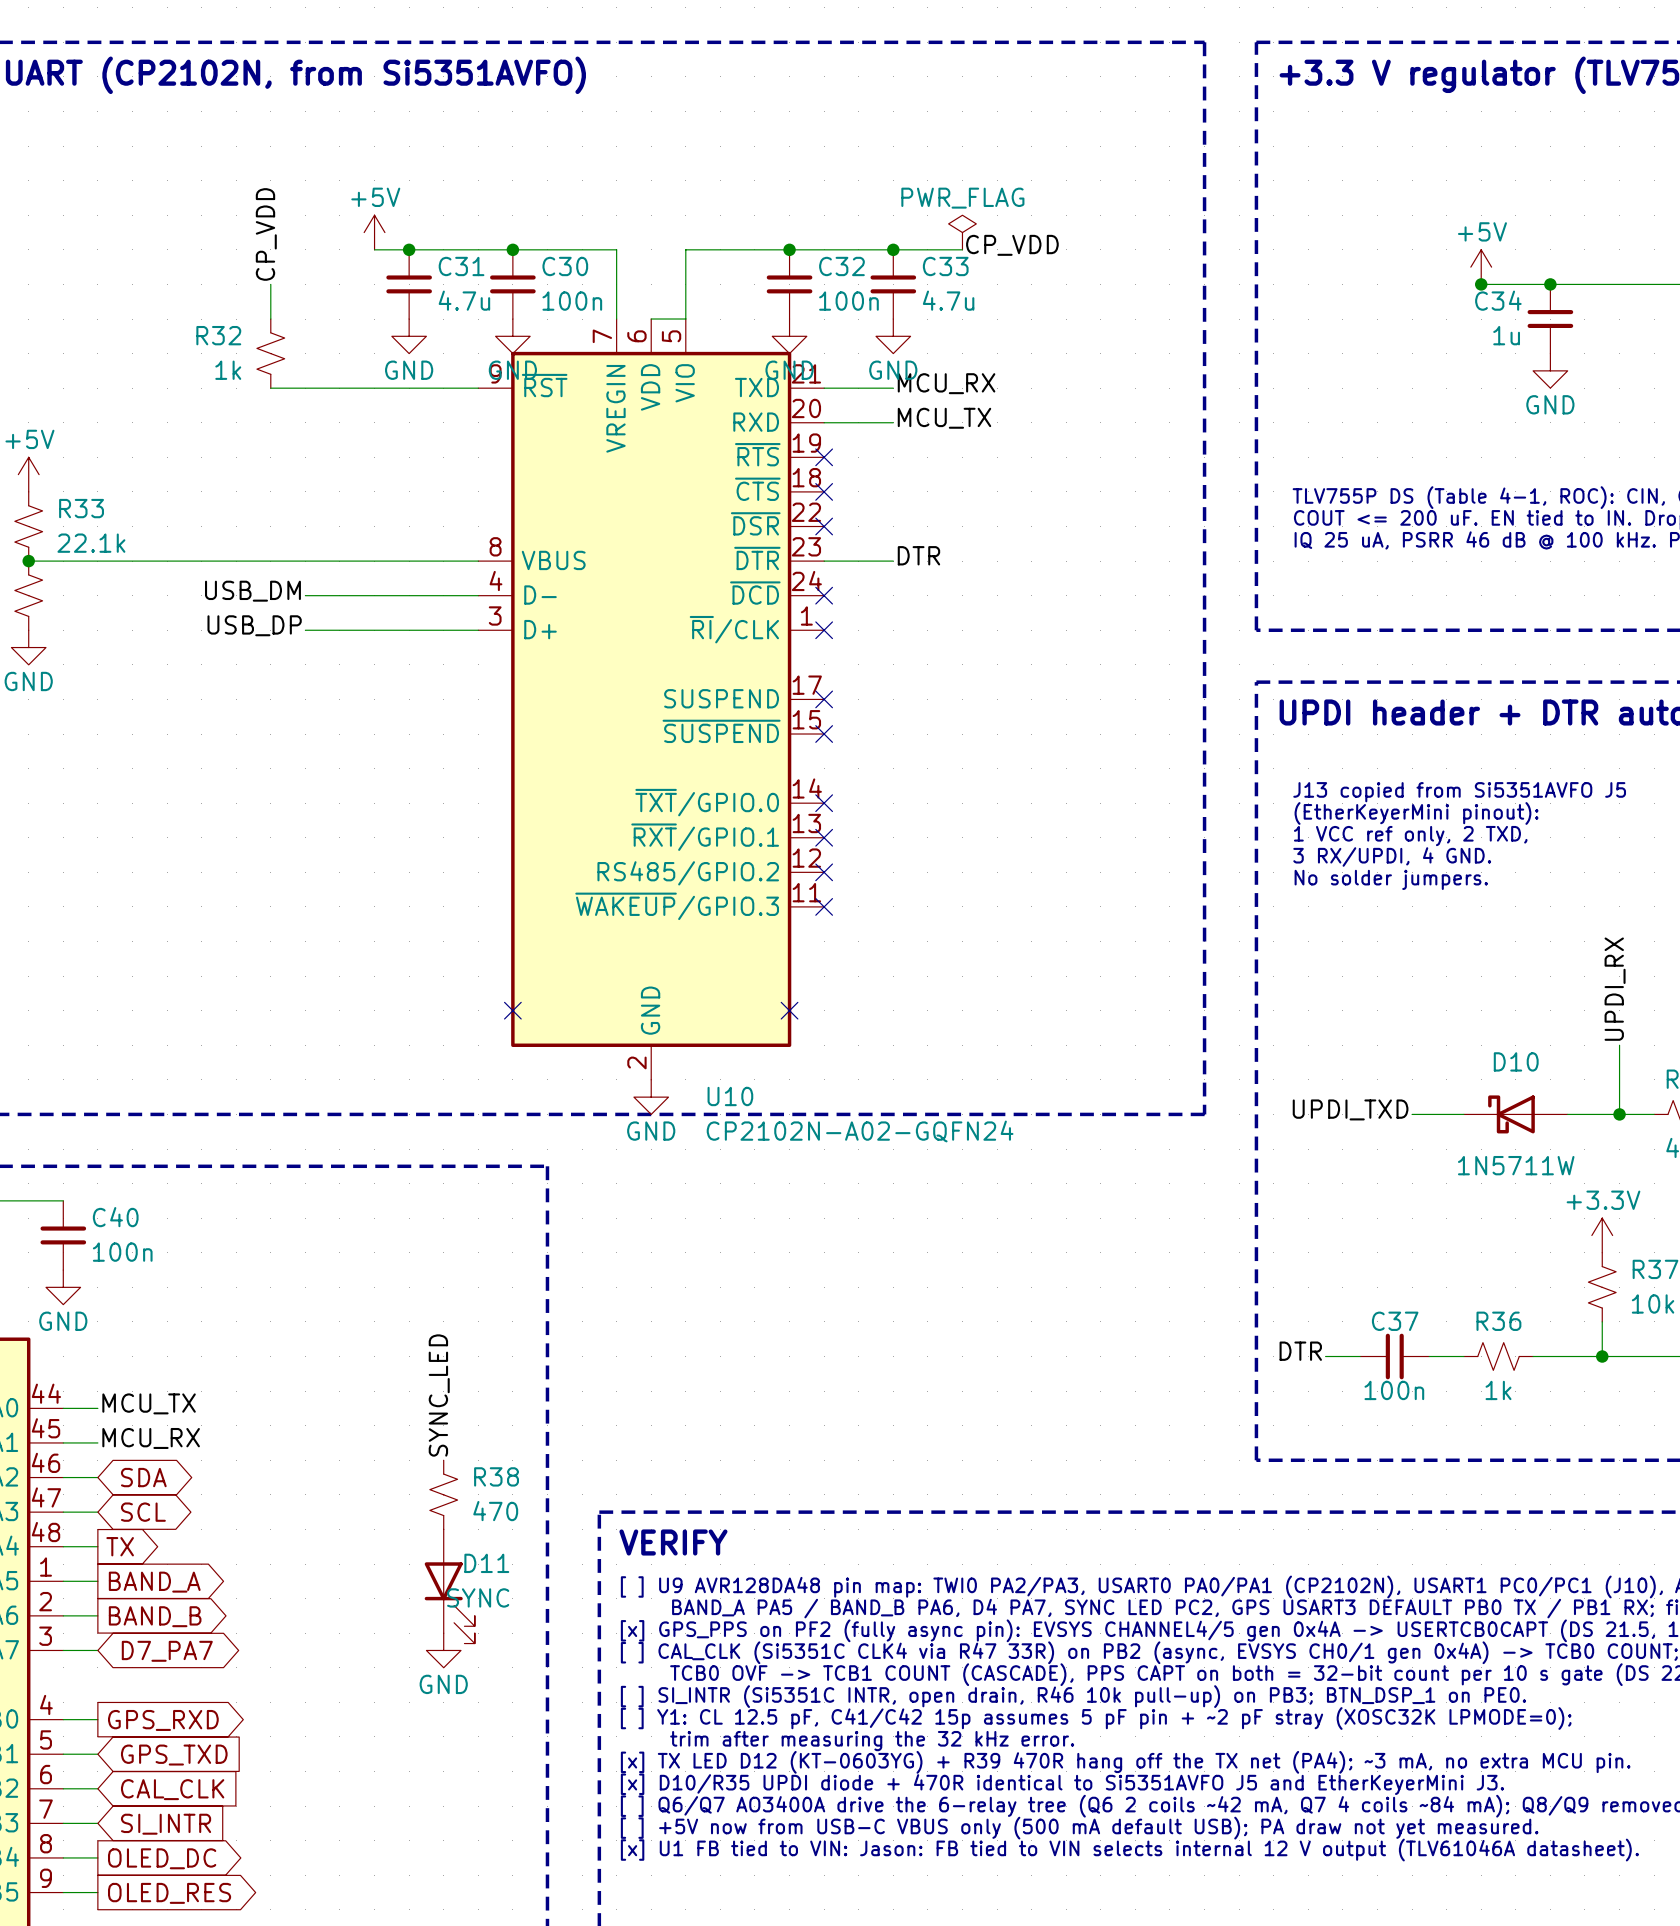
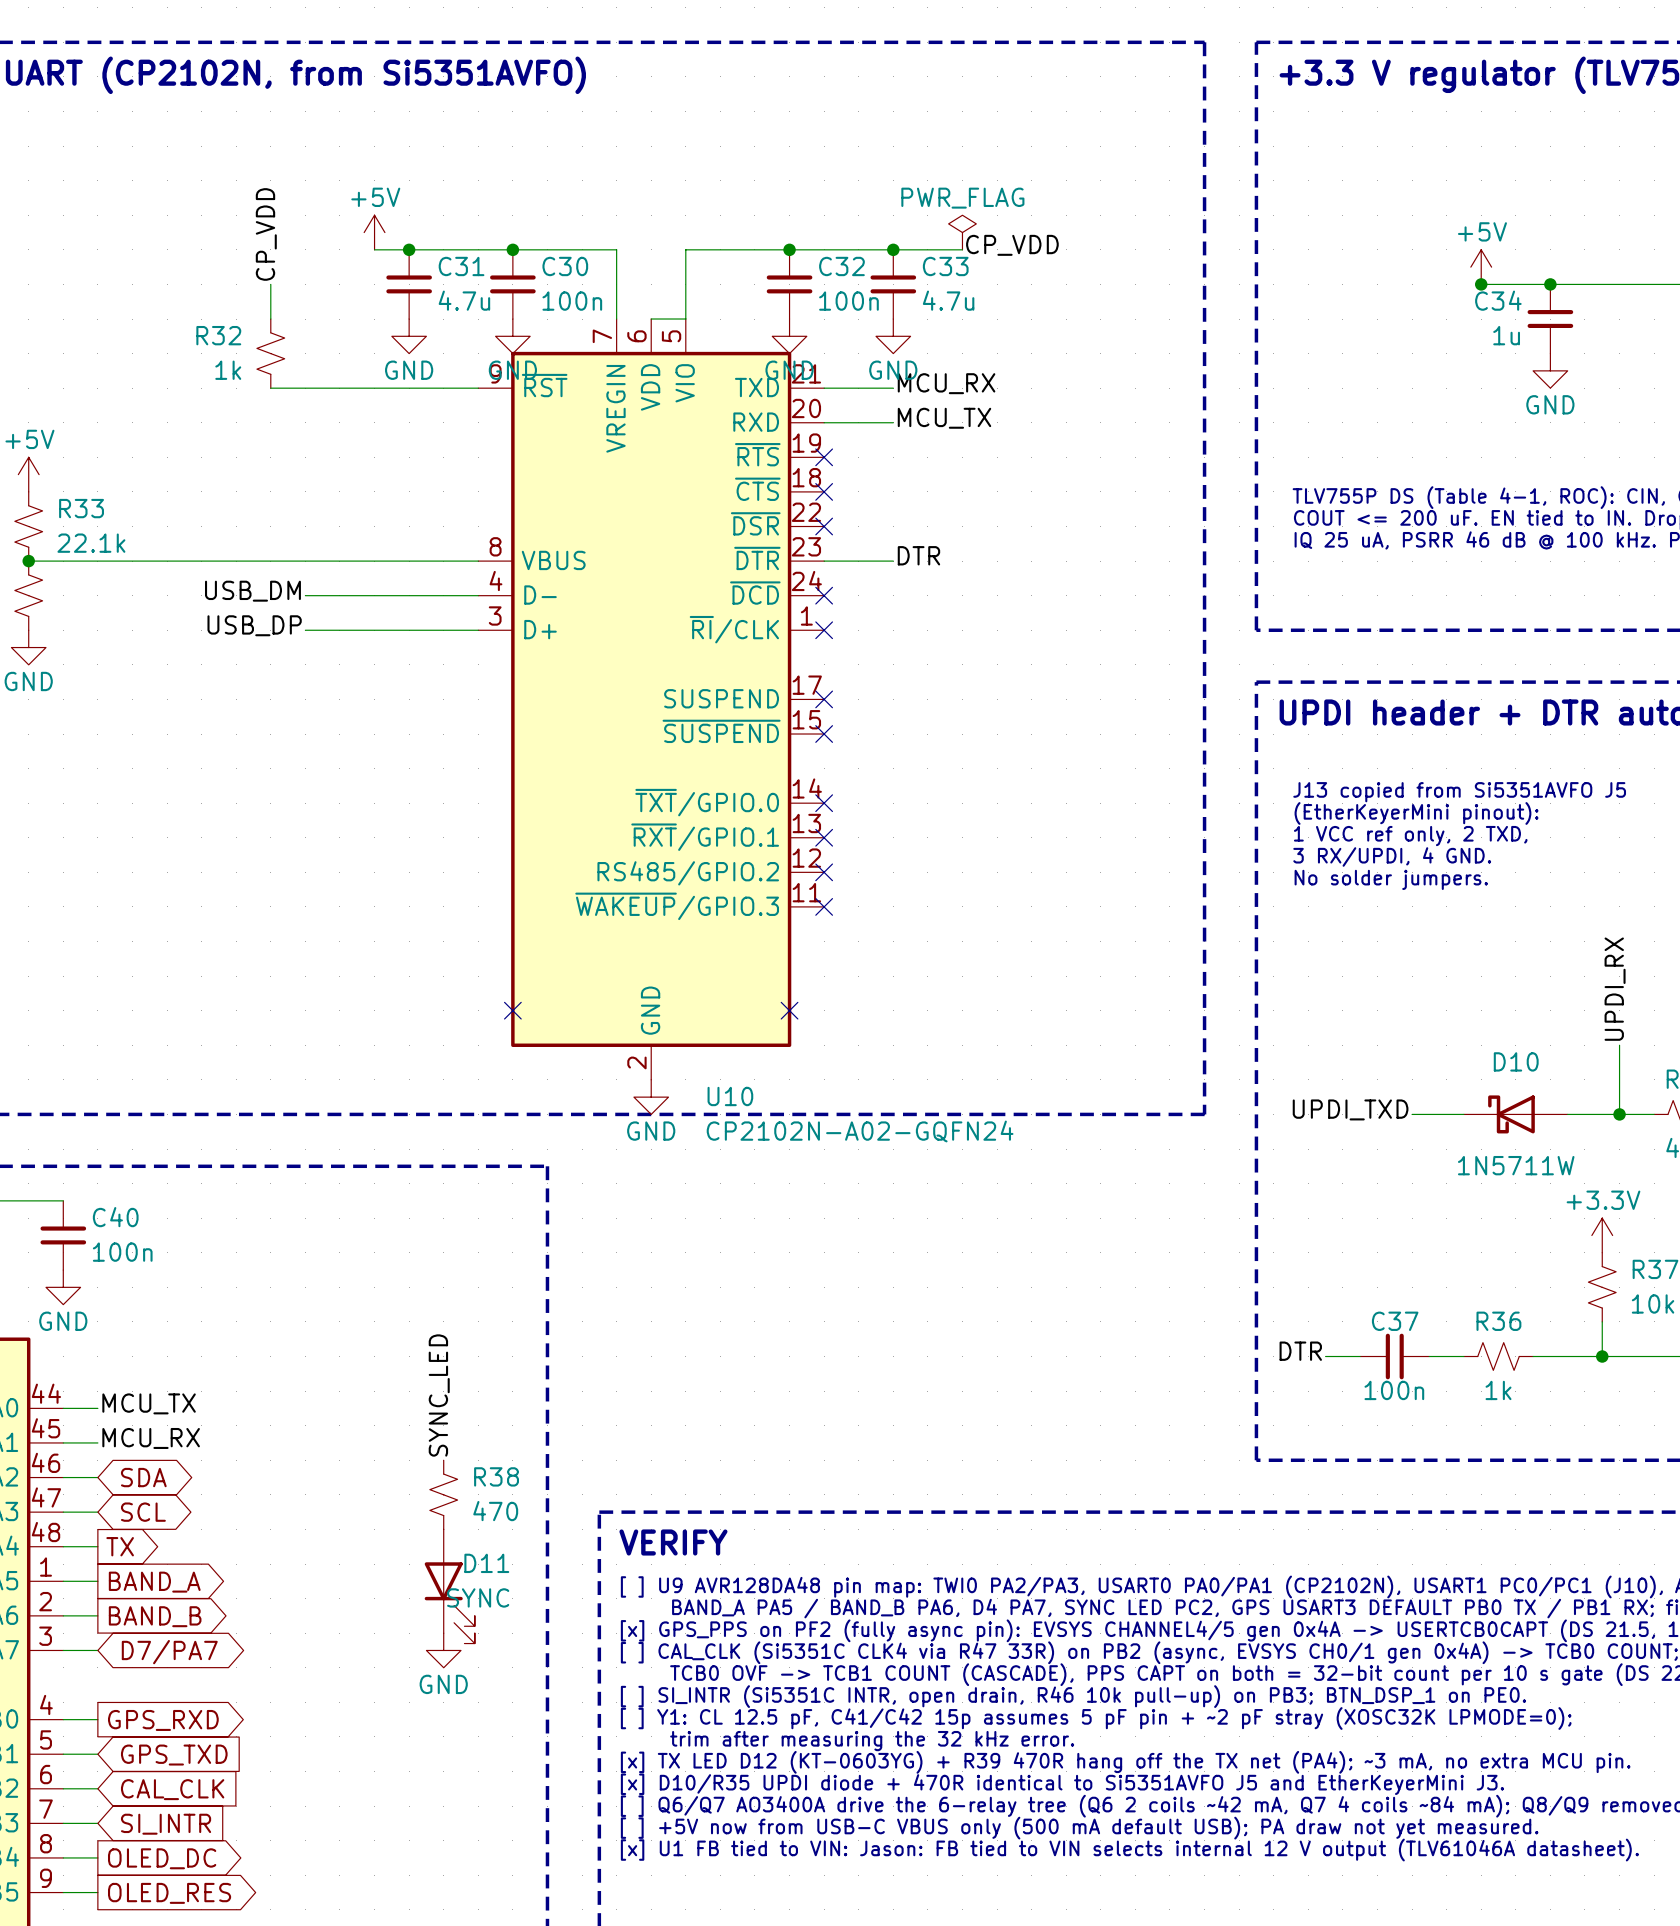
global label: D7_PA7 (167, 1651) -> D7/PA7 (169, 1652)

